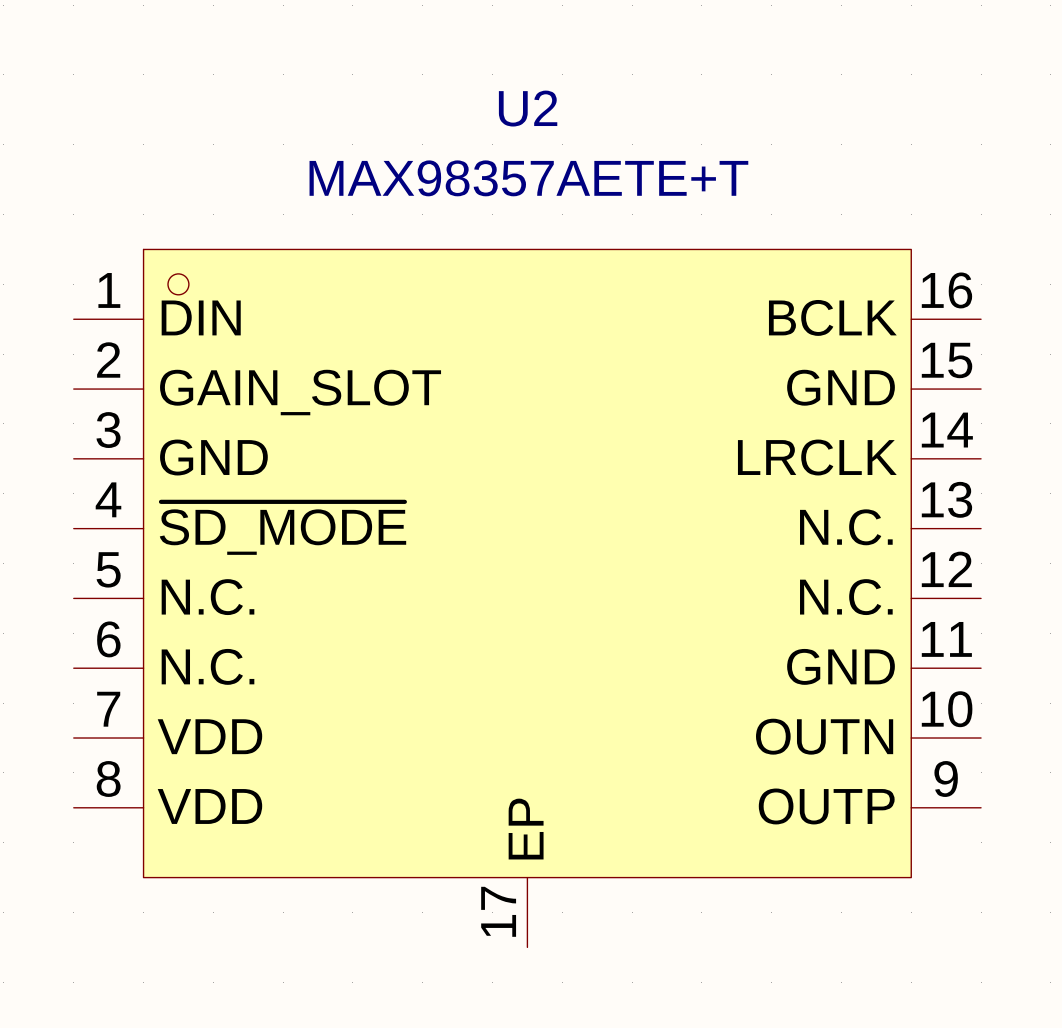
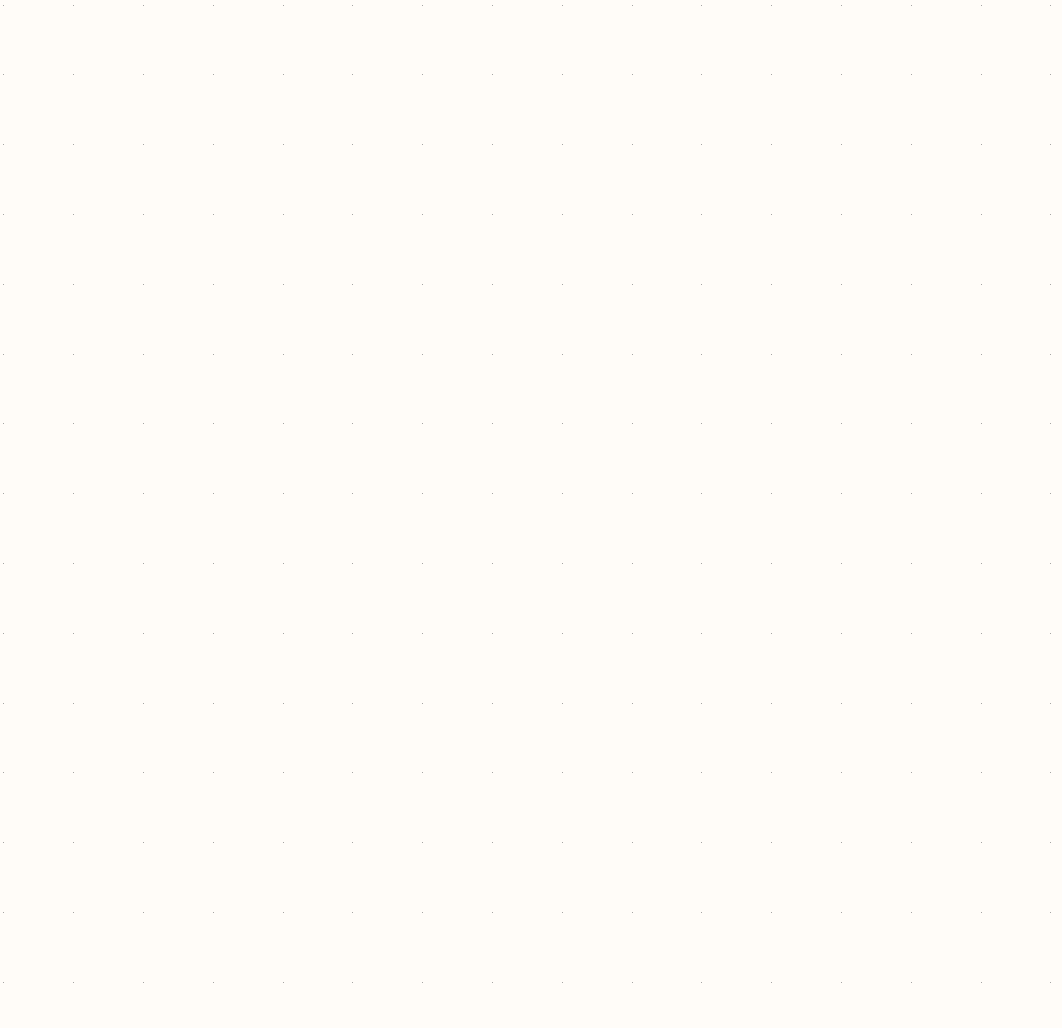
U2: MAX98357AETE+T (527, 598) -> none

